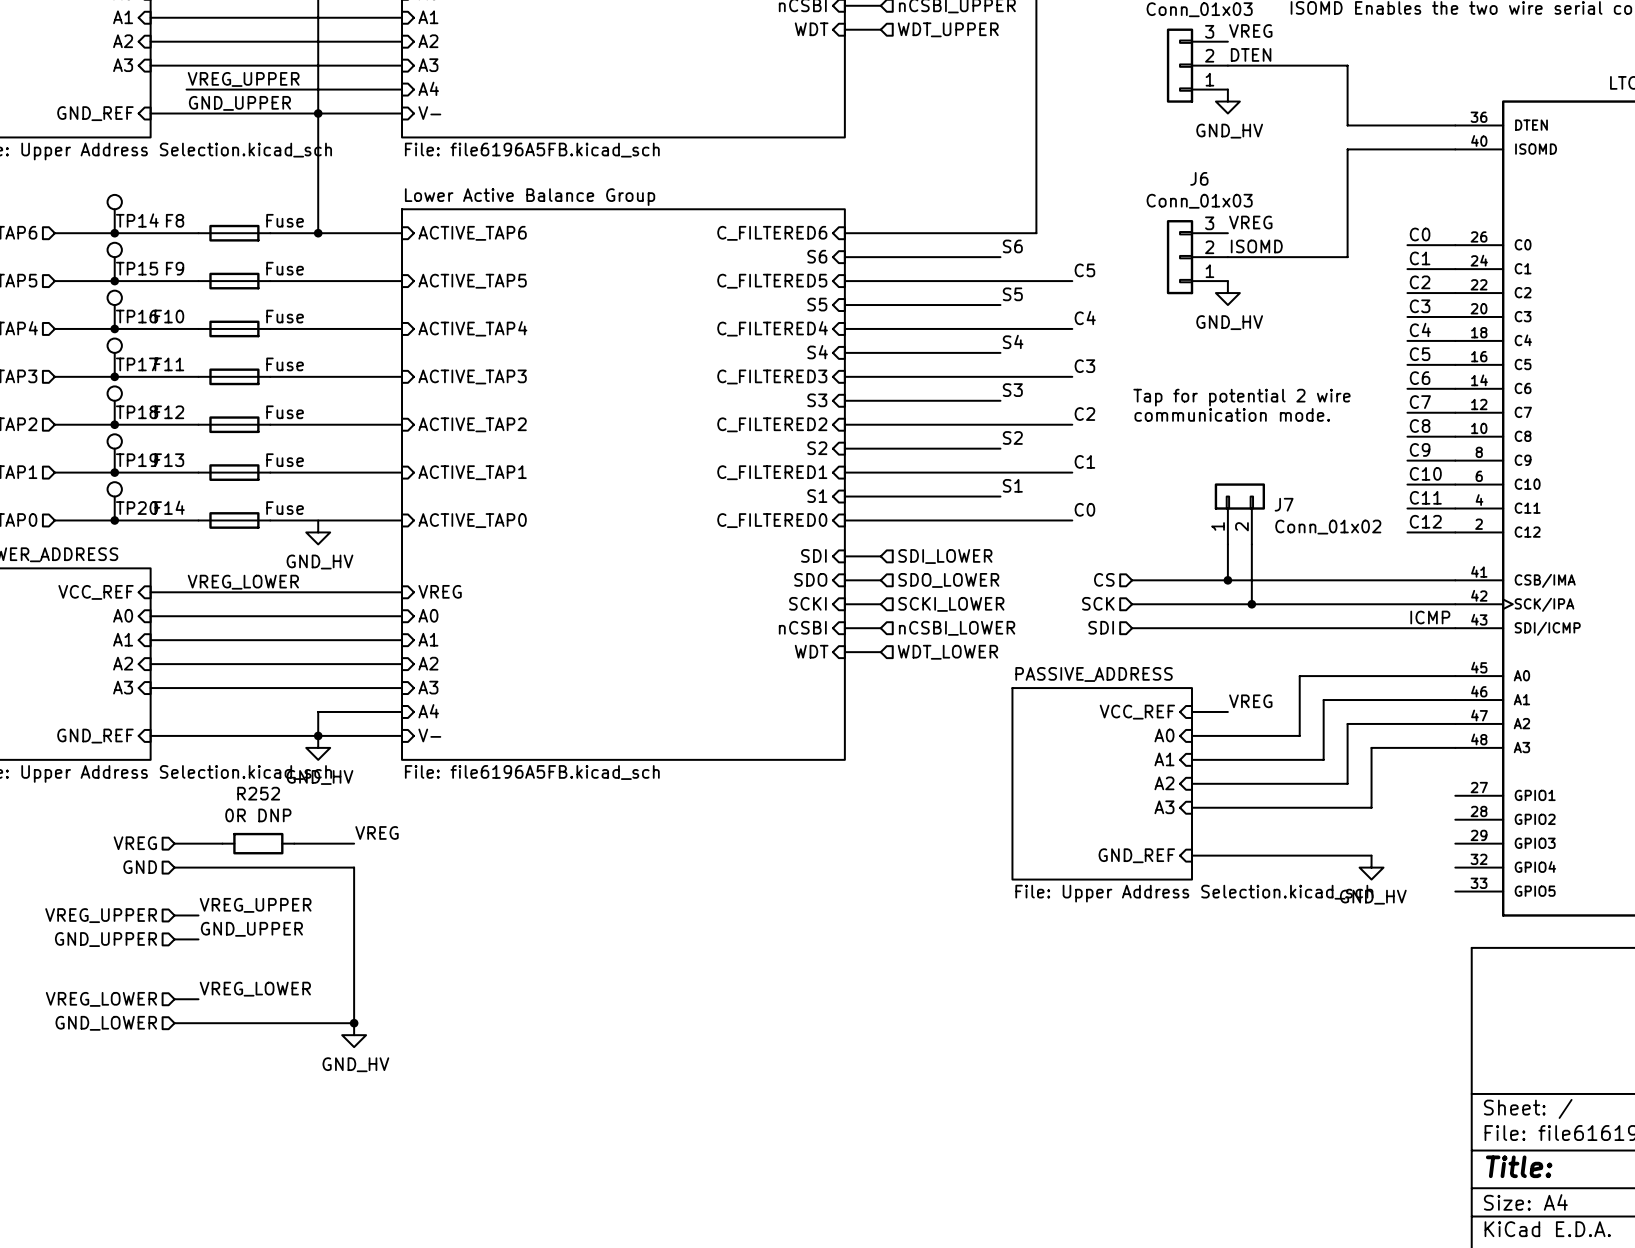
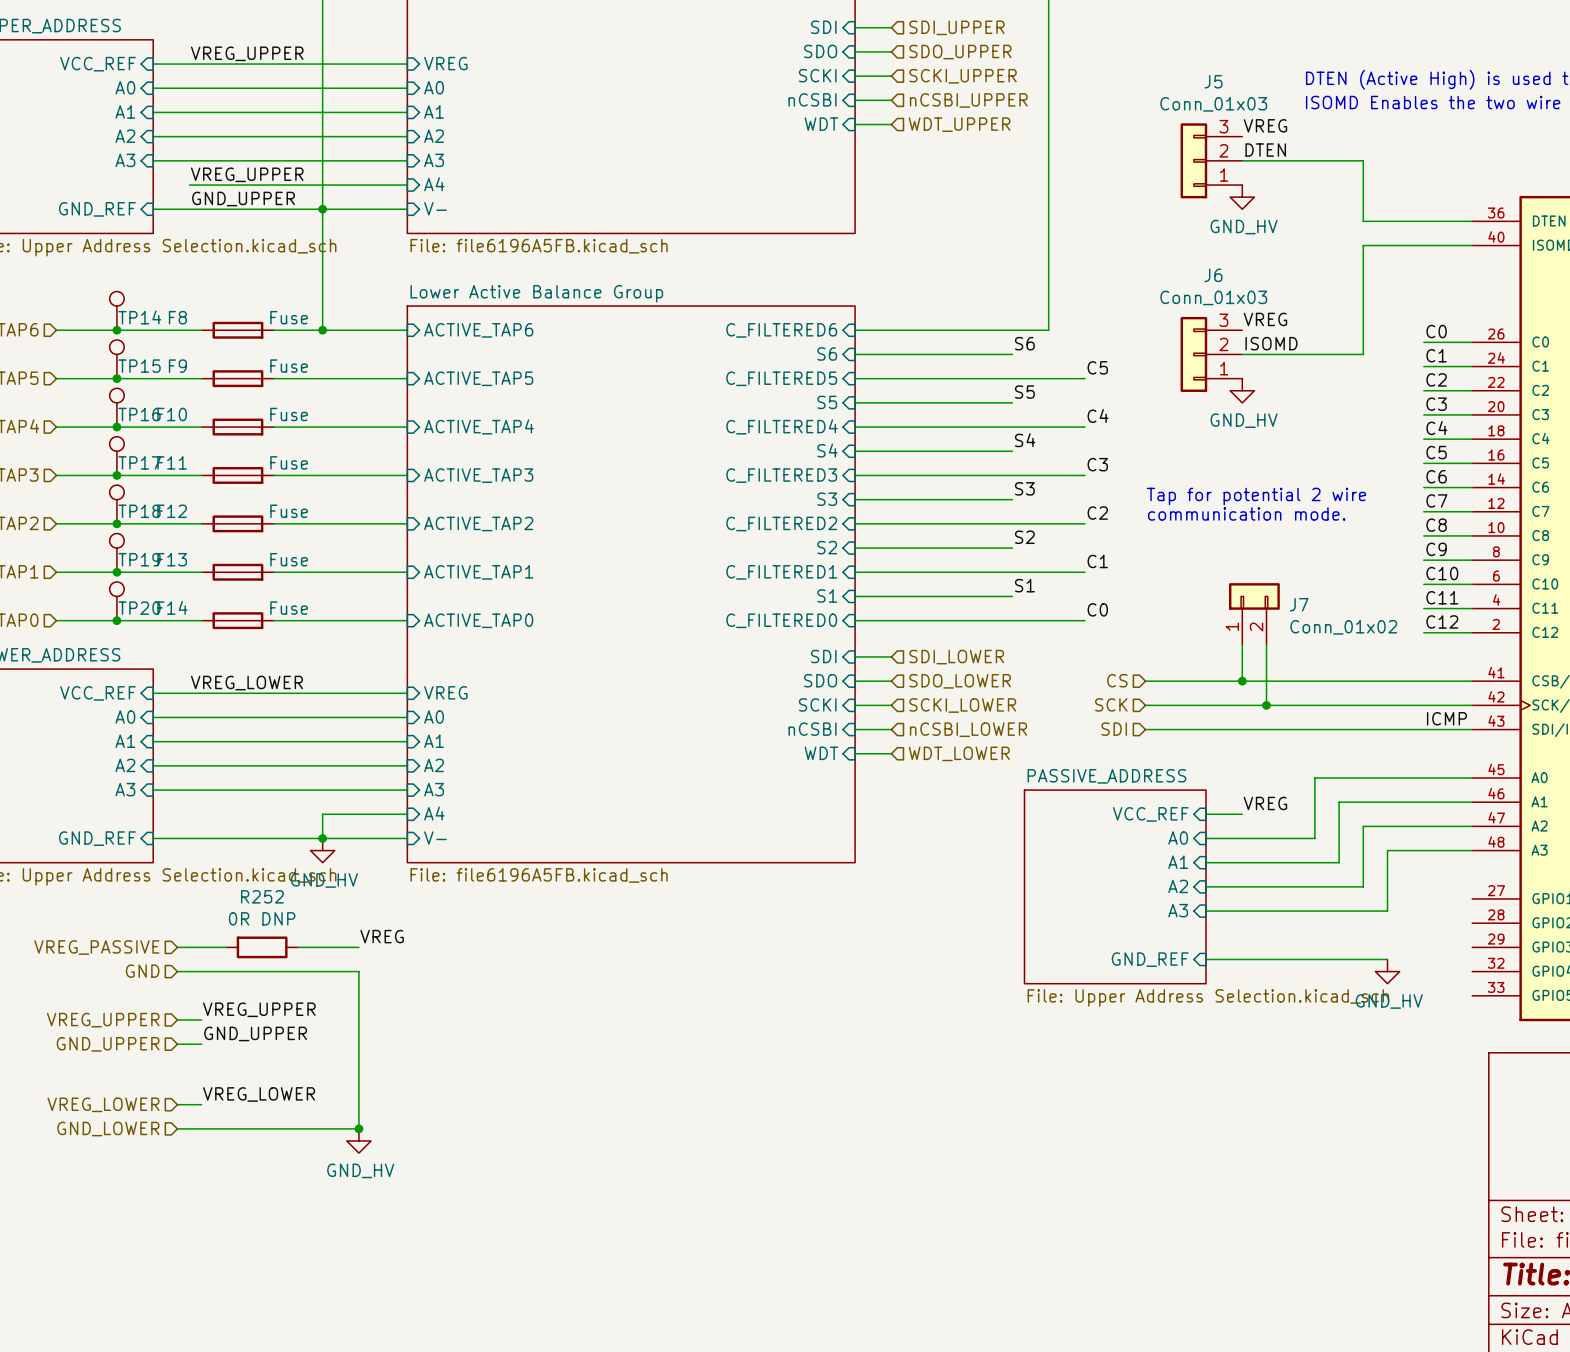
power symbol: GND_HV (318, 532) -> none
hierarchical label: VREG (135, 843) -> VREG_PASSIVE (96, 947)

